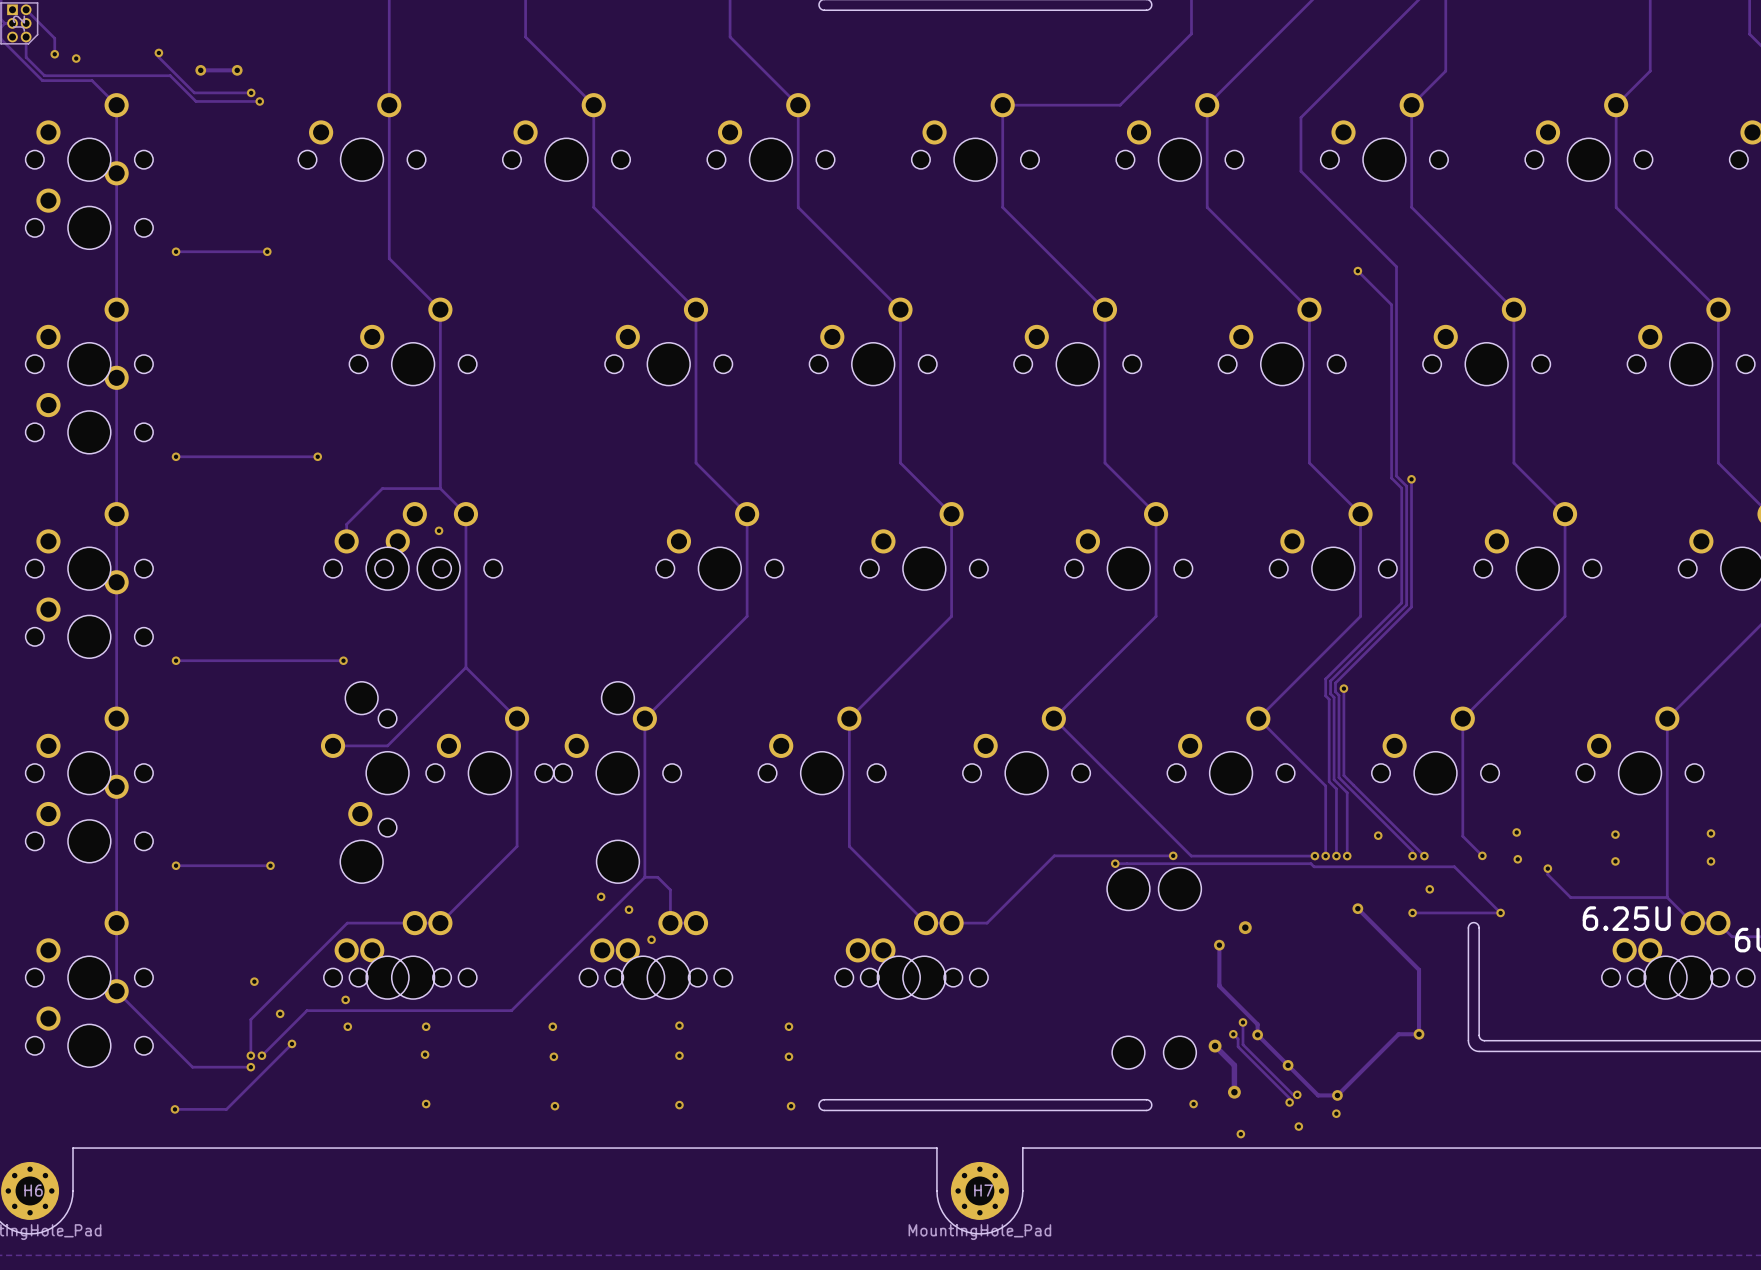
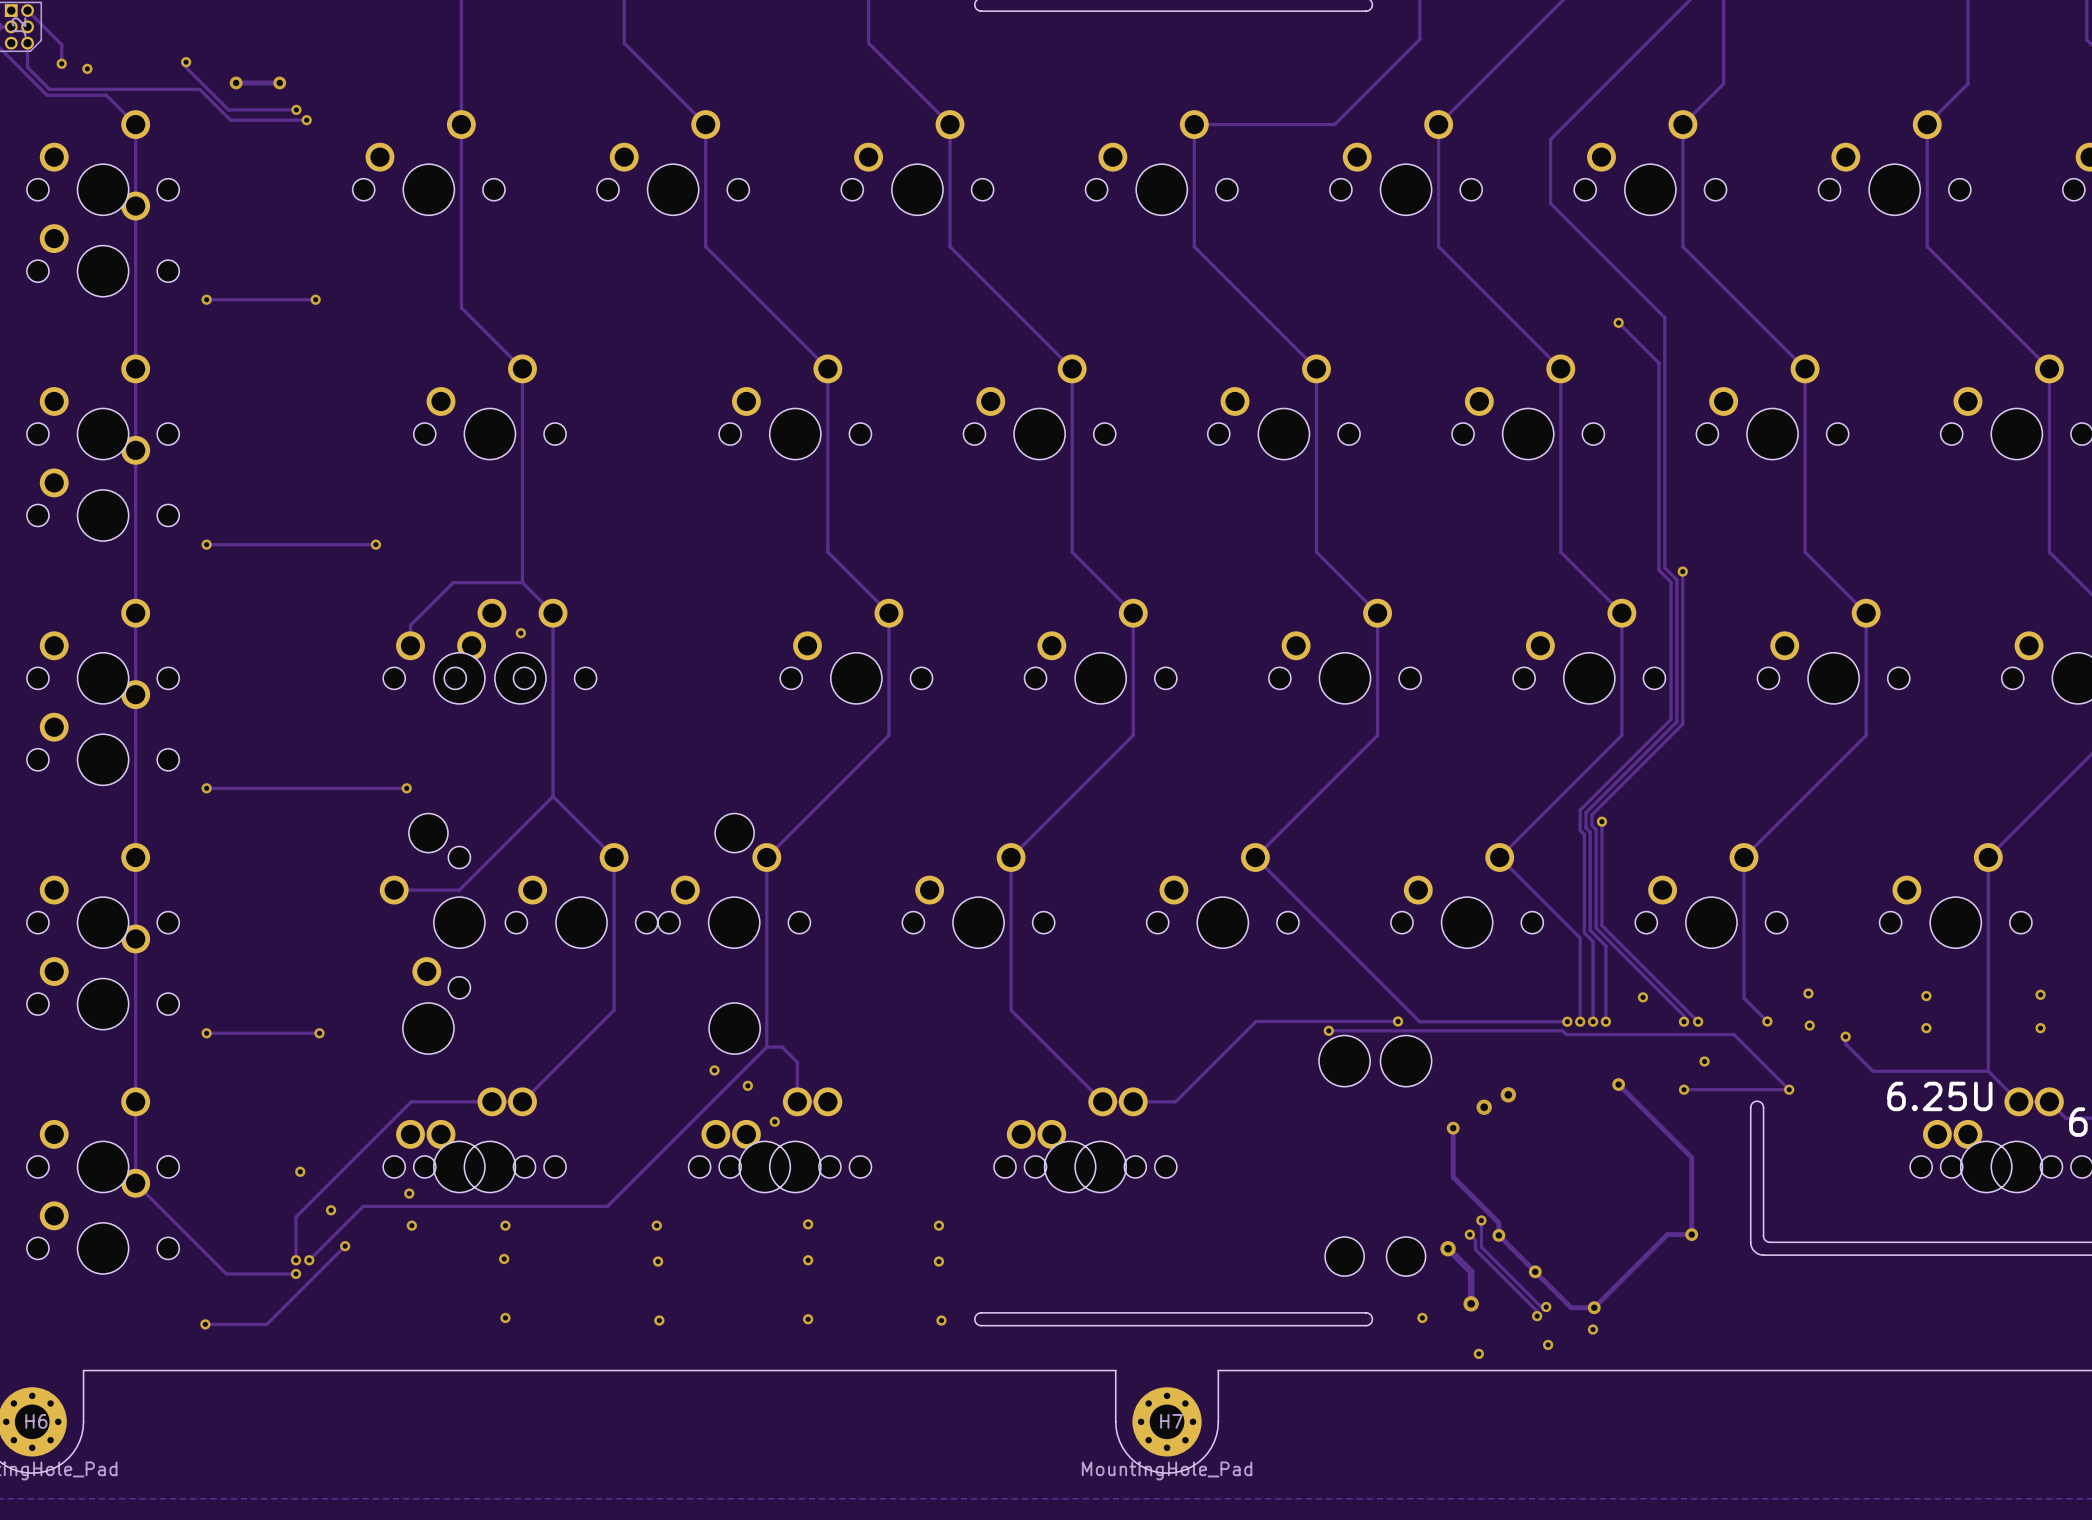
via: none -> (1508, 1094)

